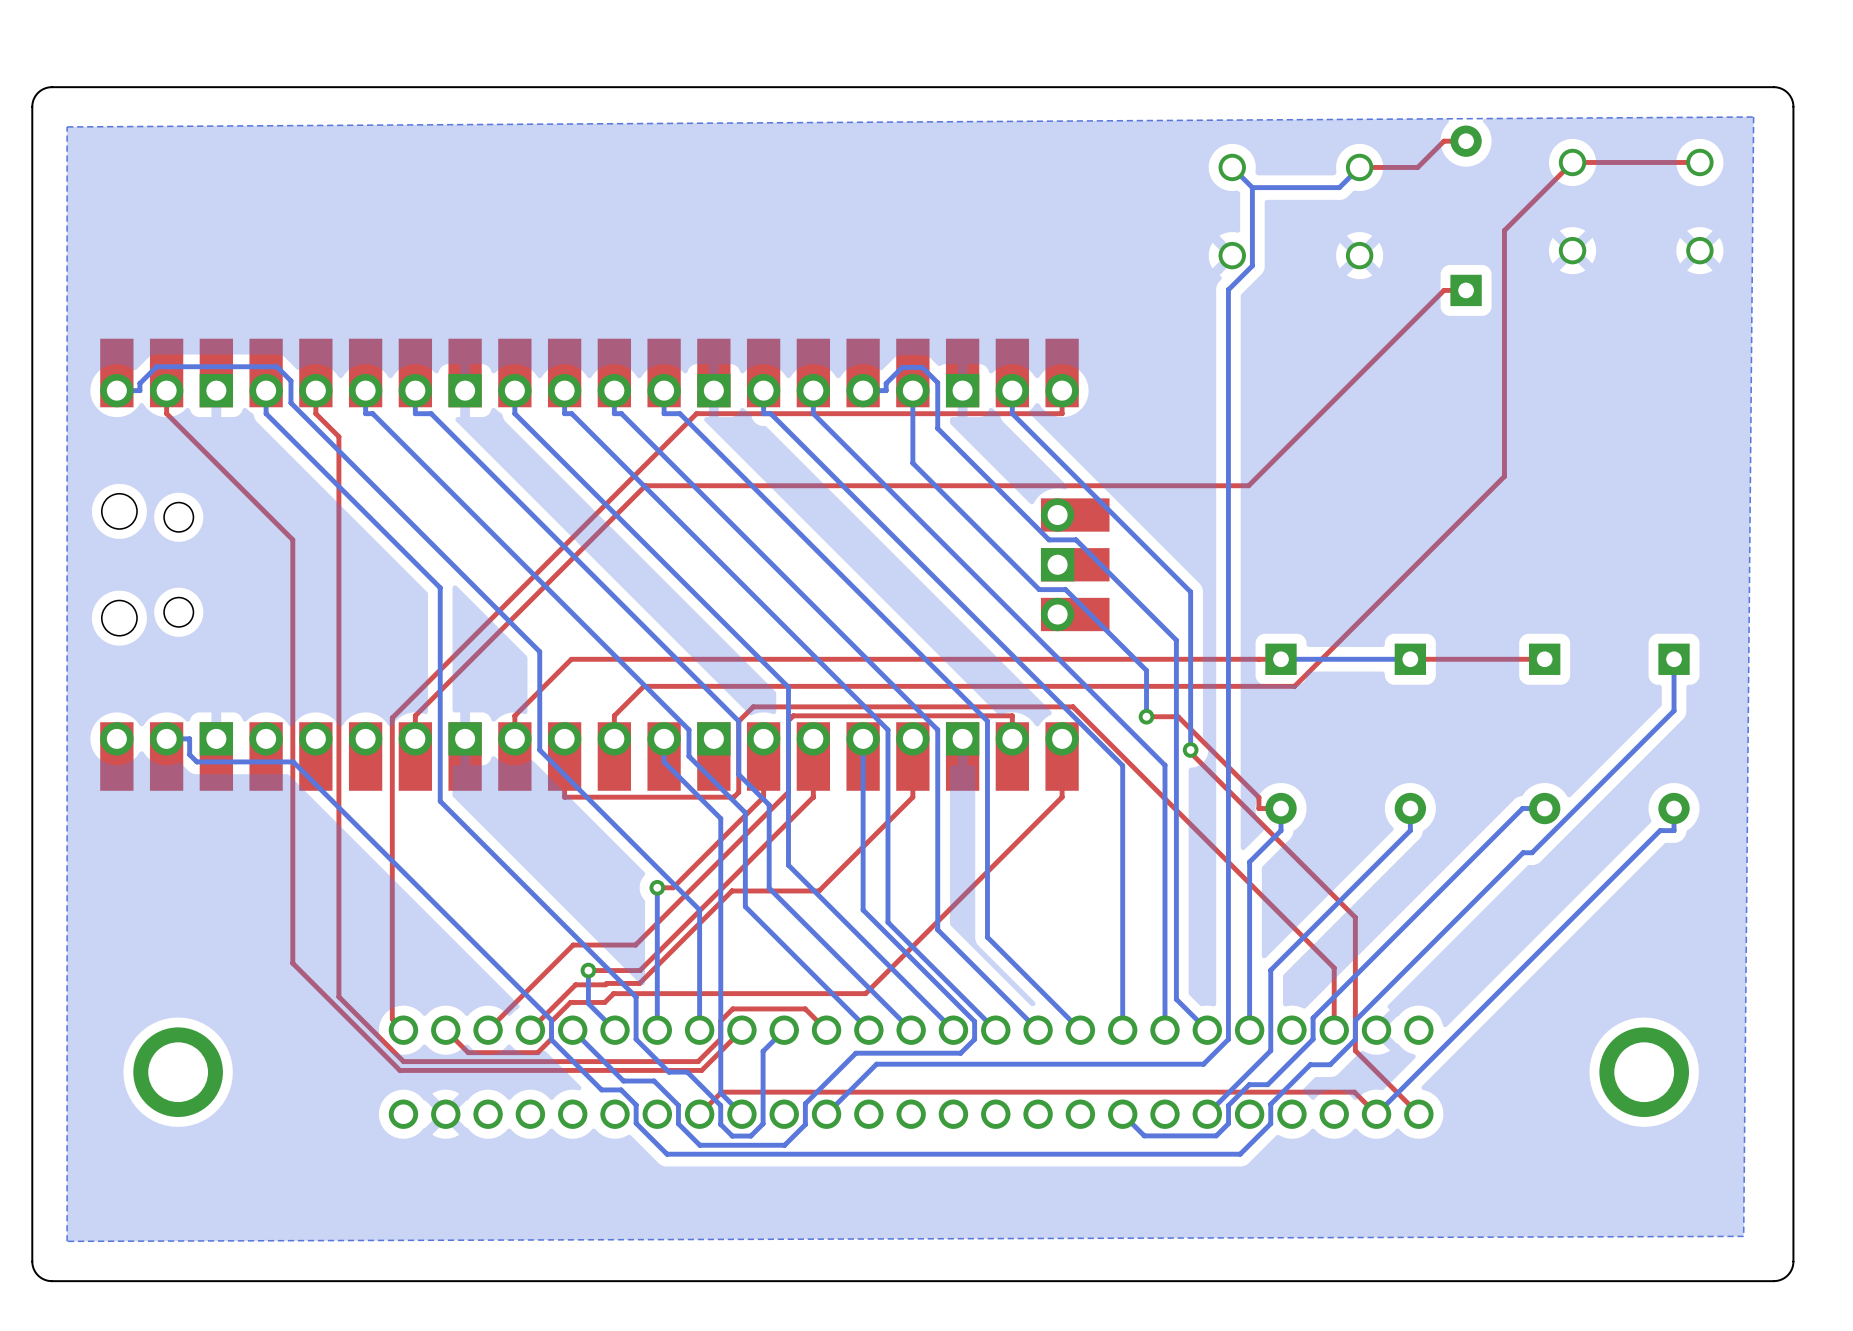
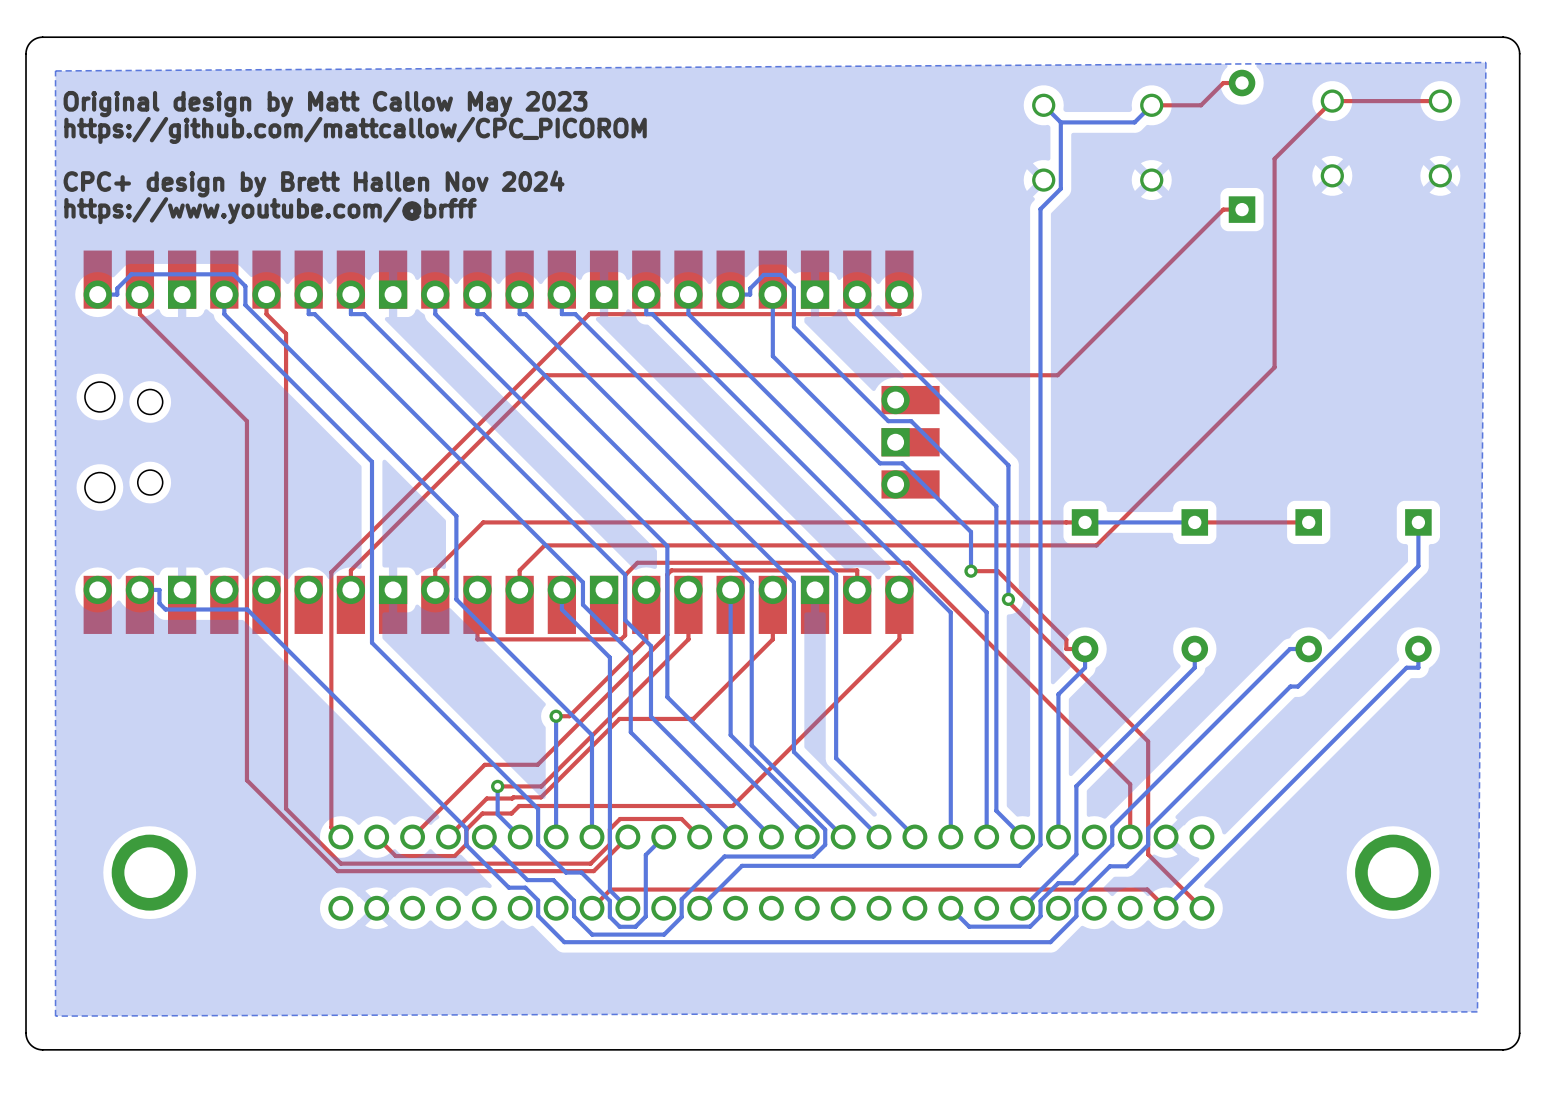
text: none -> Original design by Matt Callow May 2023 (325, 104)
text: none -> https://github.com/mattcallow/CPC_PICOROM (355, 130)
text: none -> CPC+ design by Brett Hallen Nov 2024 (314, 183)
text: none -> https://www.youtube.com/@brfff (270, 210)

